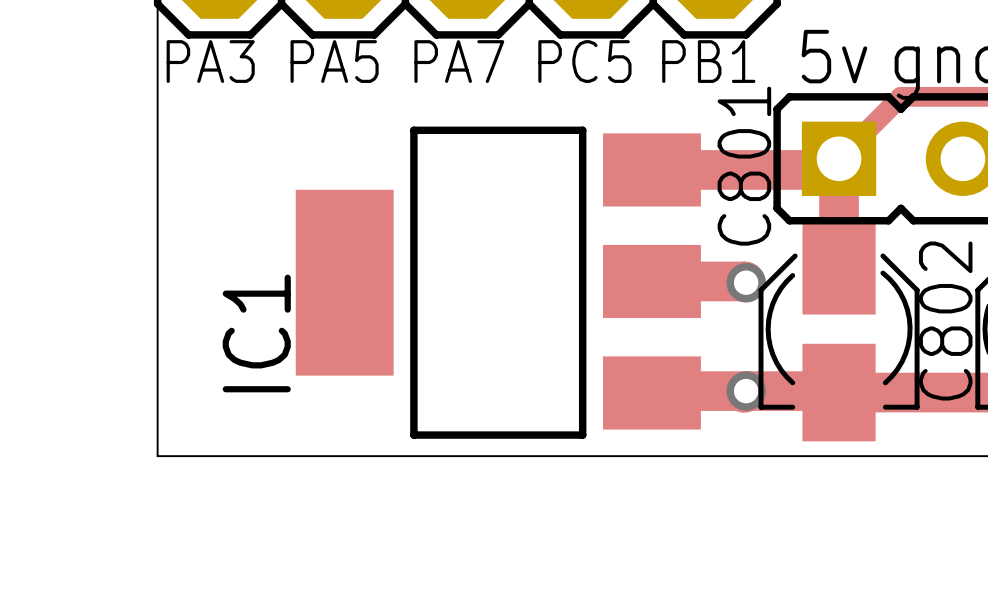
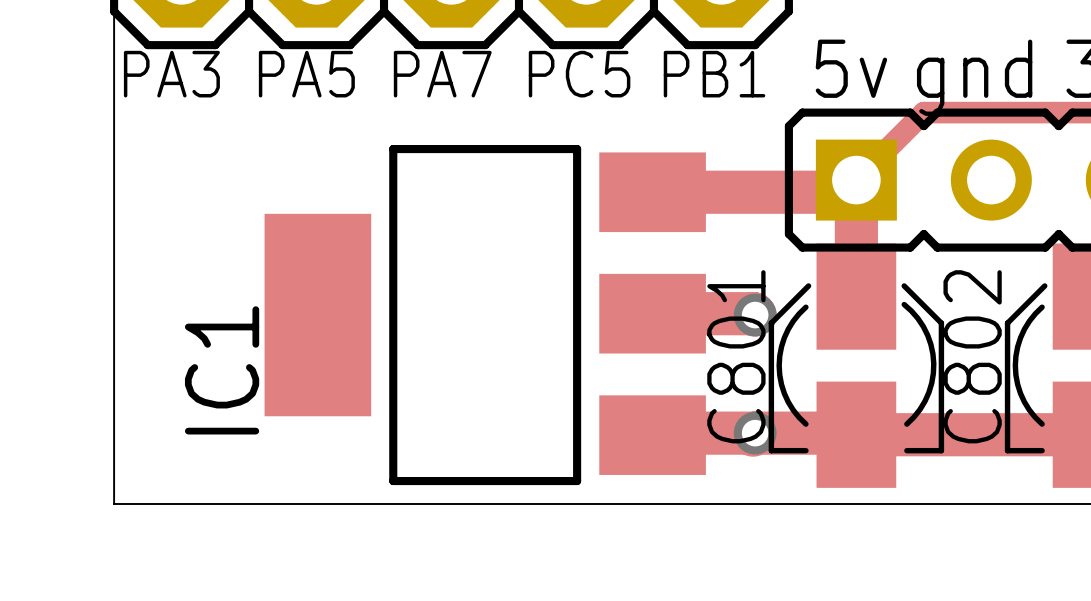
C801 name position: C801 (744, 166) -> C801 (736, 356)

